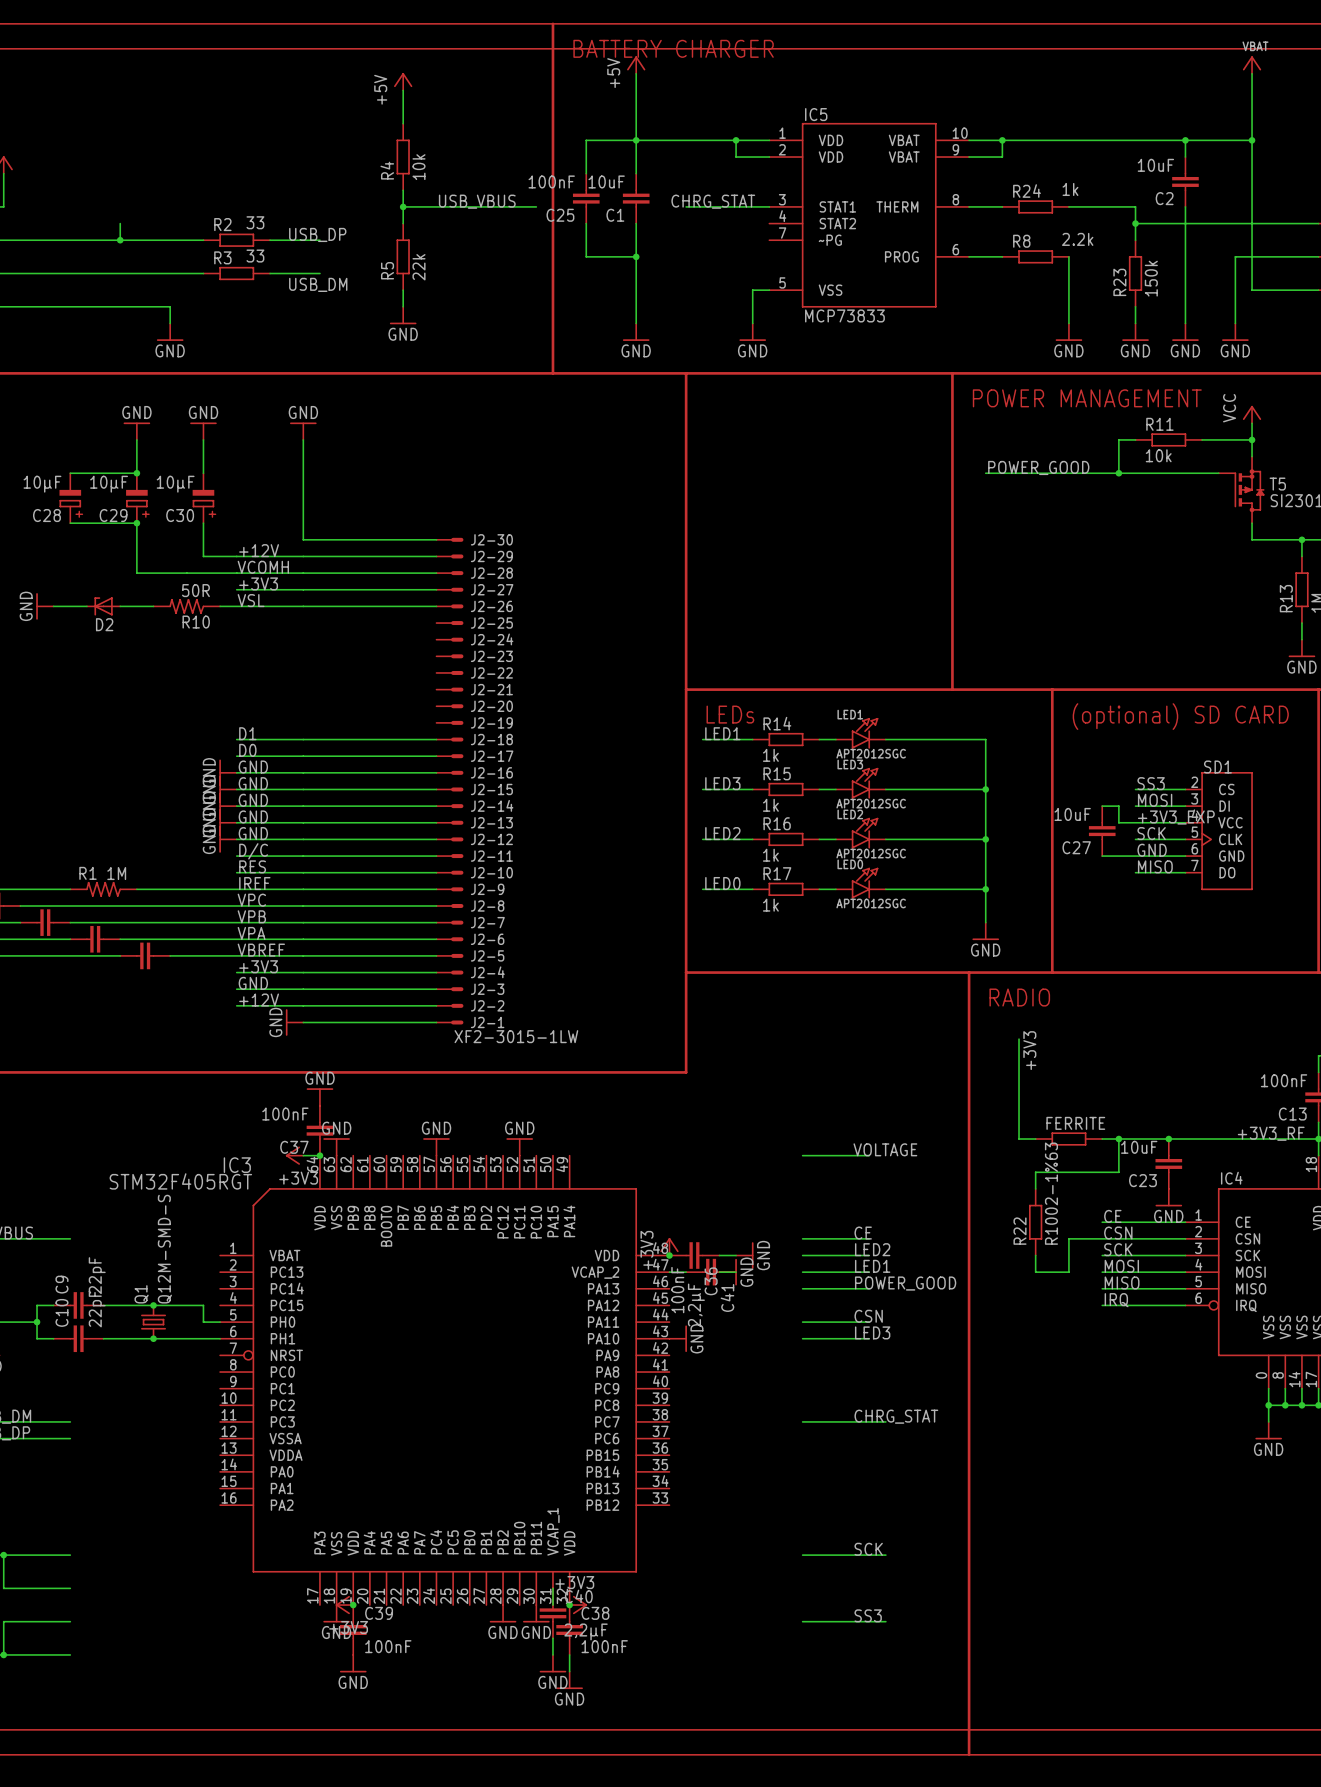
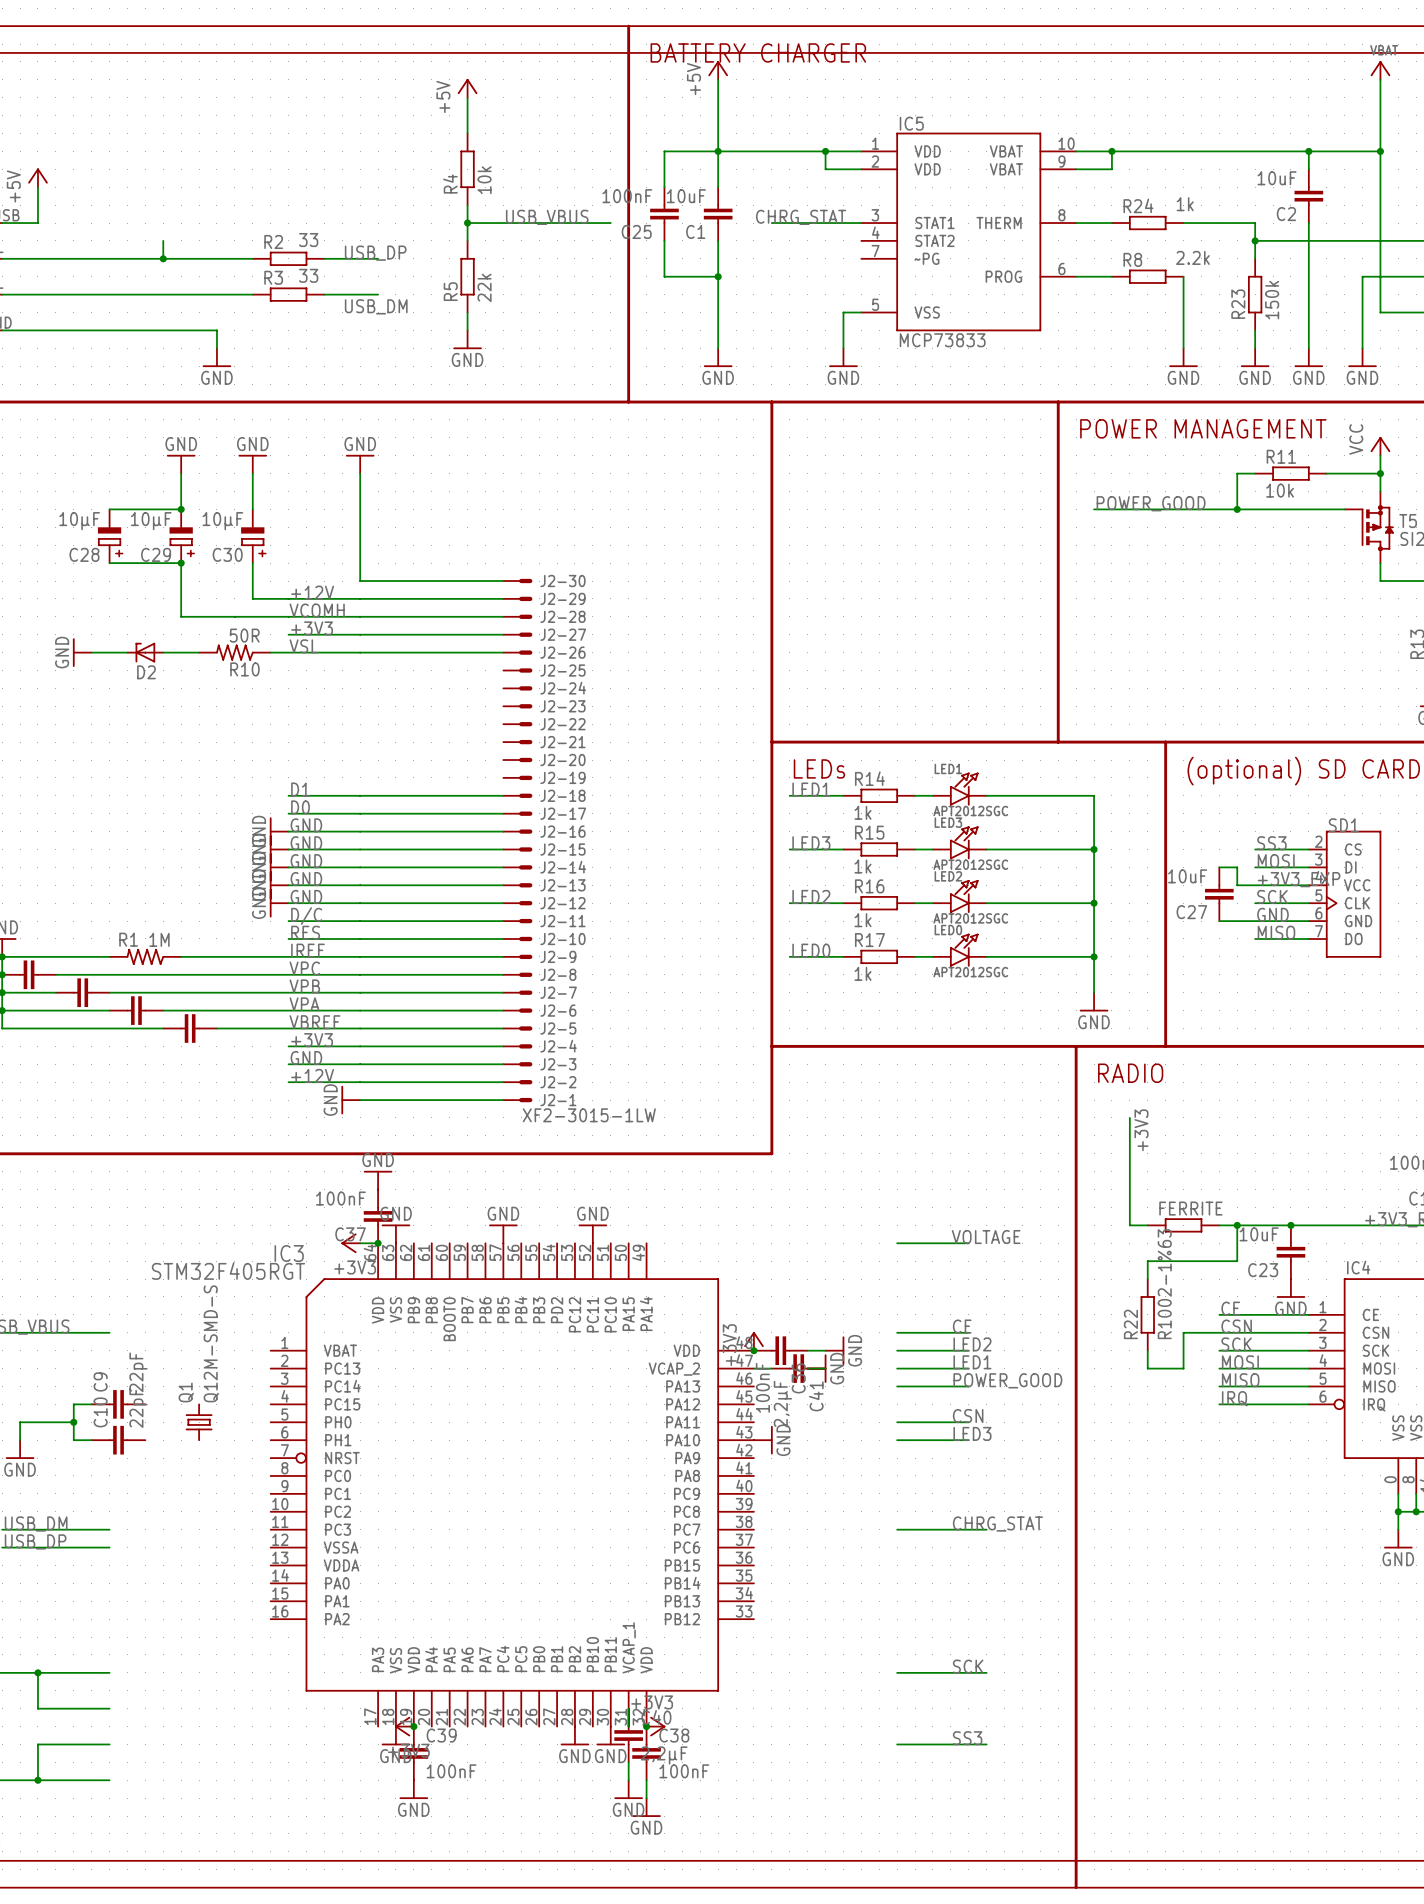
wire: (103, 1305) (203, 1305) (203, 1322) (220, 1322) -> none
junction: (153, 1305) -> none
wire: (103, 1338) (220, 1338) -> none
junction: (153, 1338) -> none

